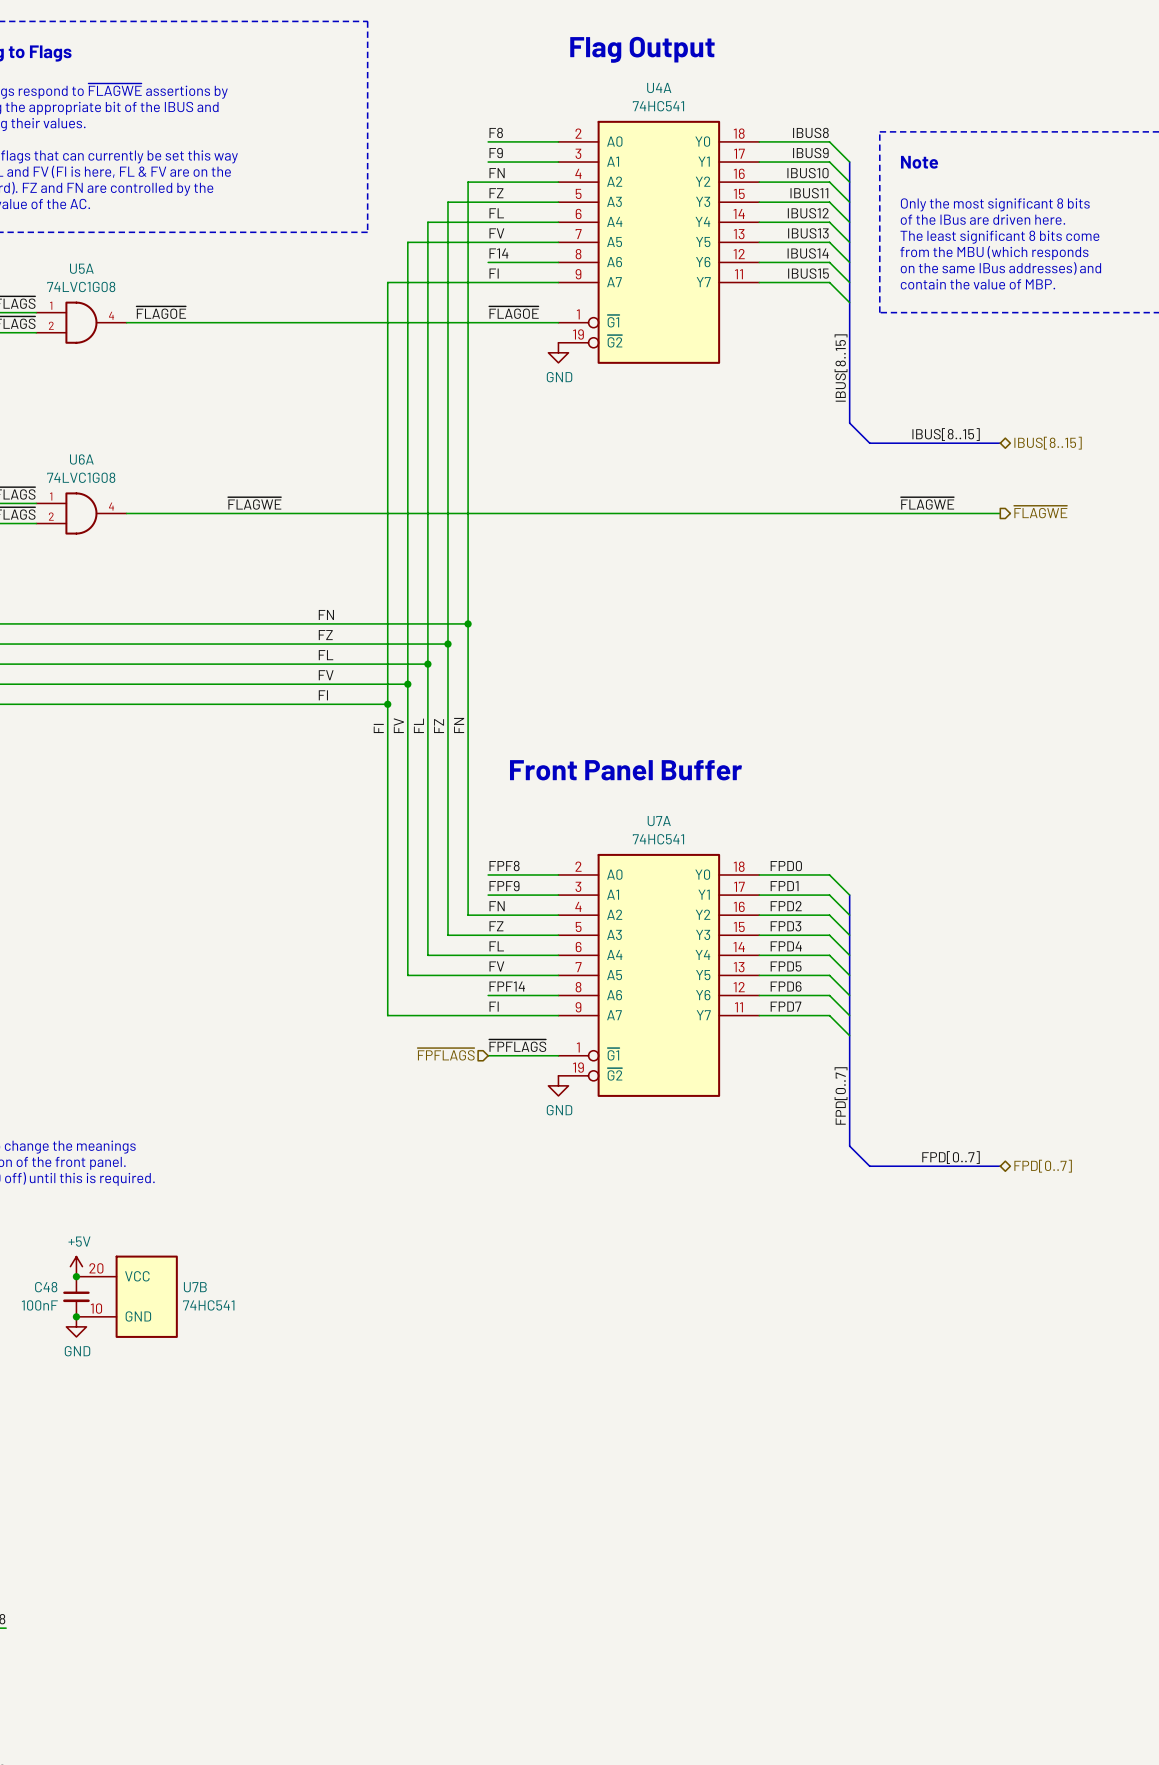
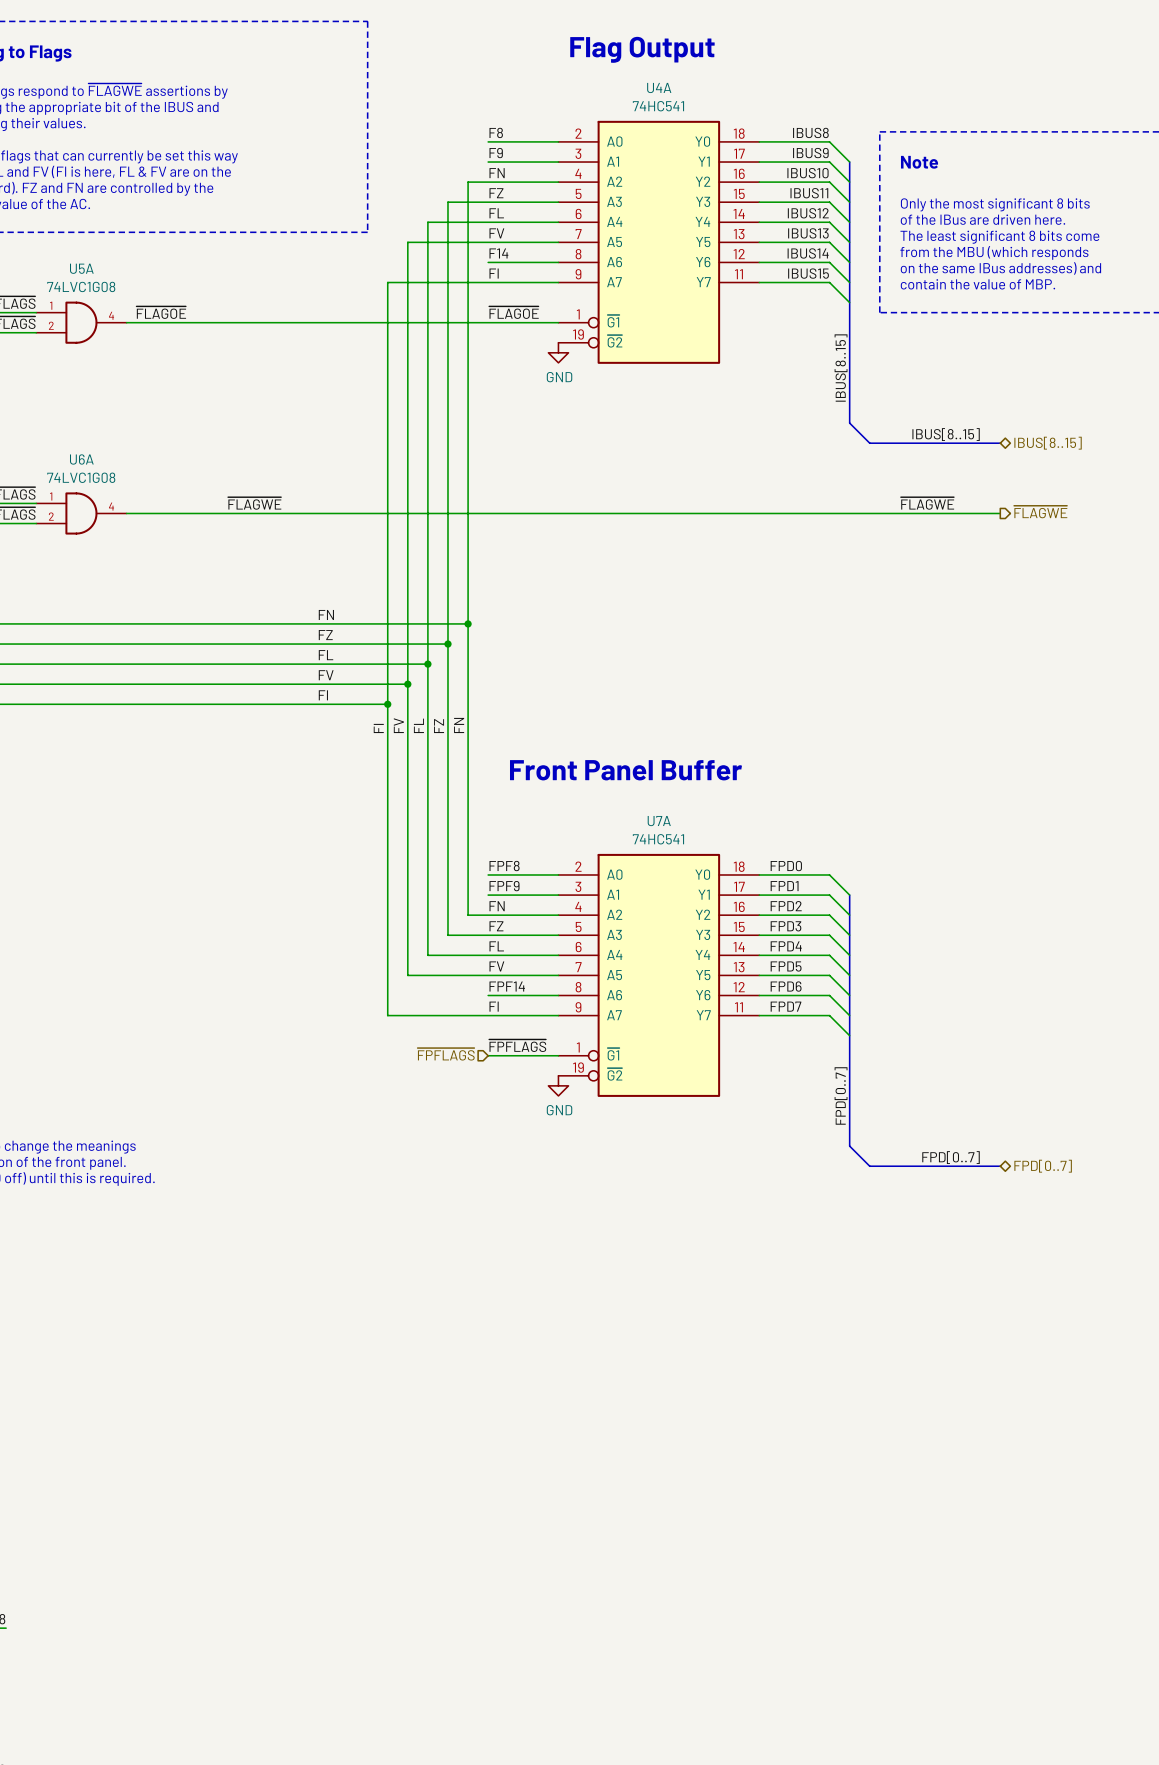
power symbol: +5V (76, 1266) -> none
junction: (76, 1276) -> none
C48: 100nF (76, 1296) -> none
U7B: 74HC541 (127, 1296) -> none
junction: (76, 1316) -> none
power symbol: GND (76, 1326) -> none

